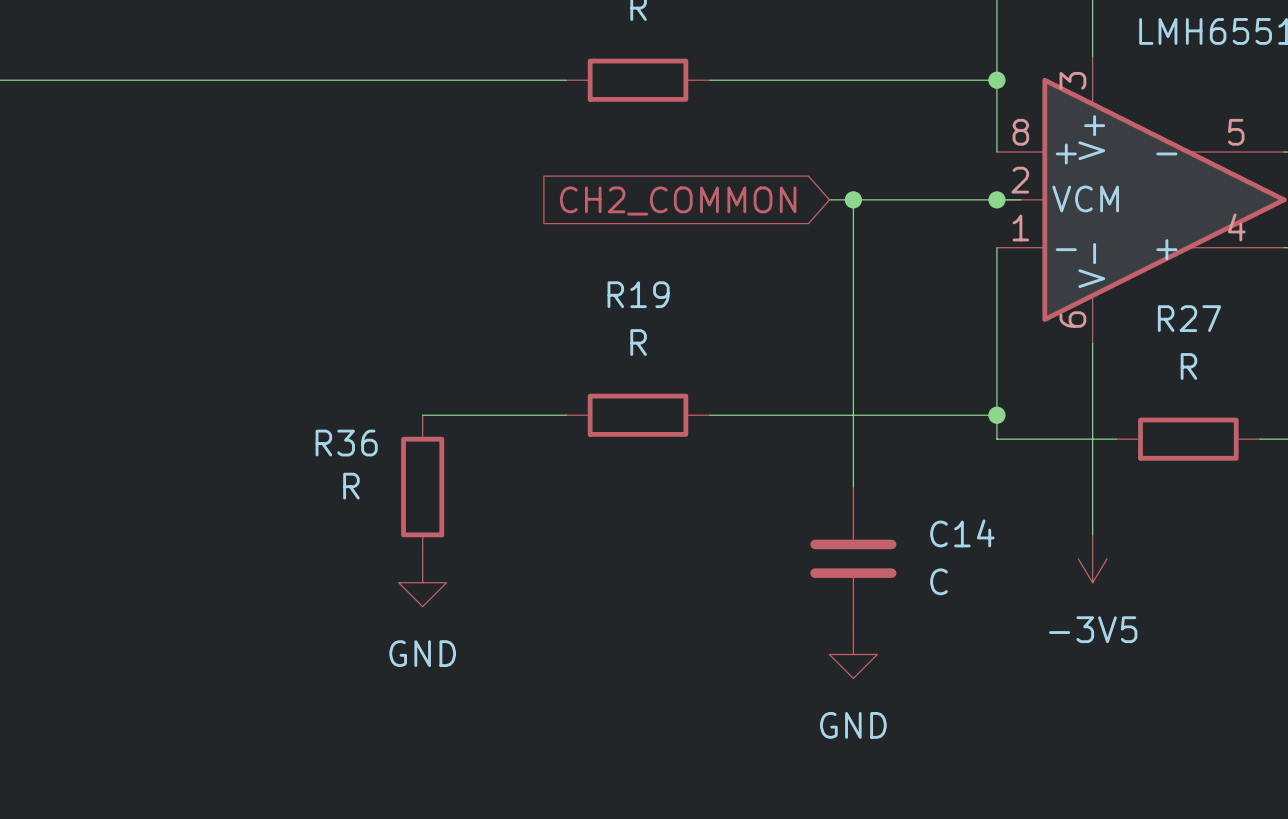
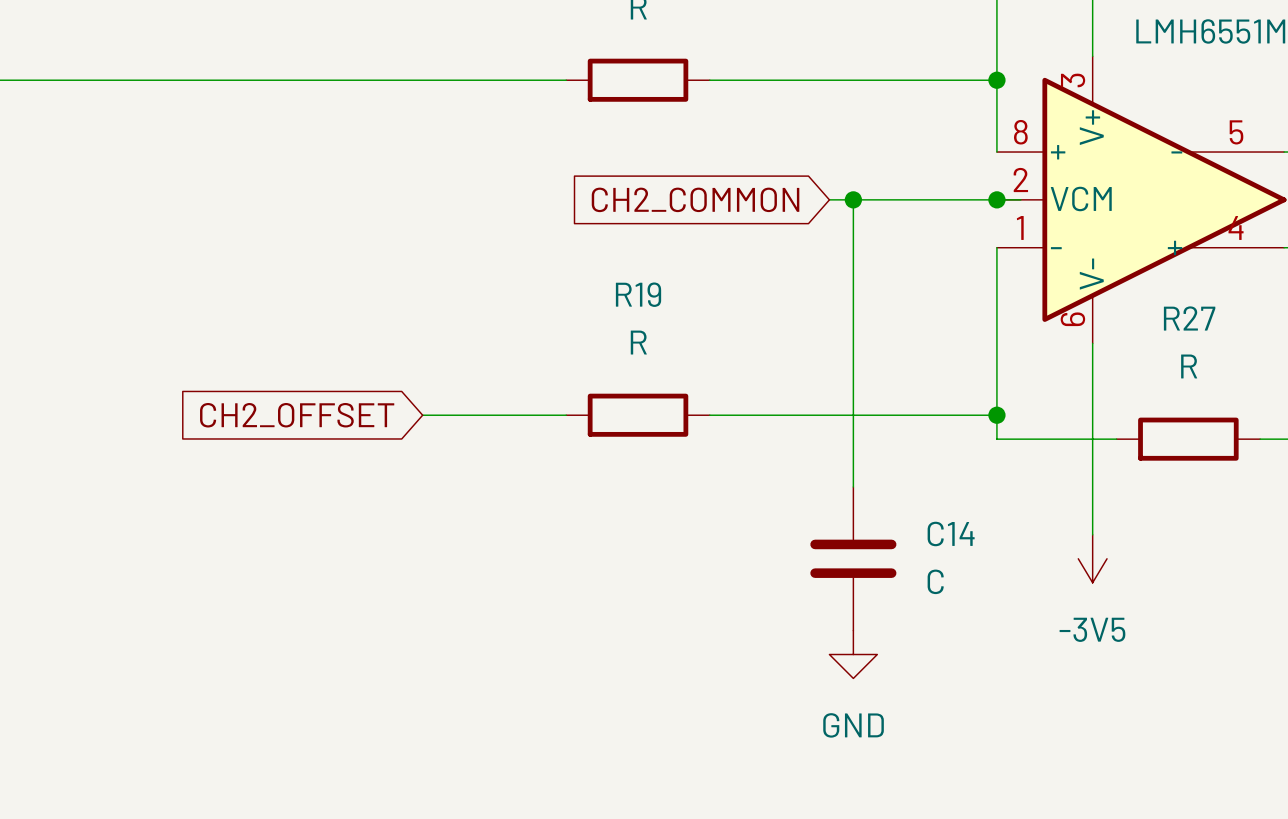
global label: none -> CH2_OFFSET (297, 415)
R36: R (422, 487) -> none
power symbol: GND (422, 582) -> none

